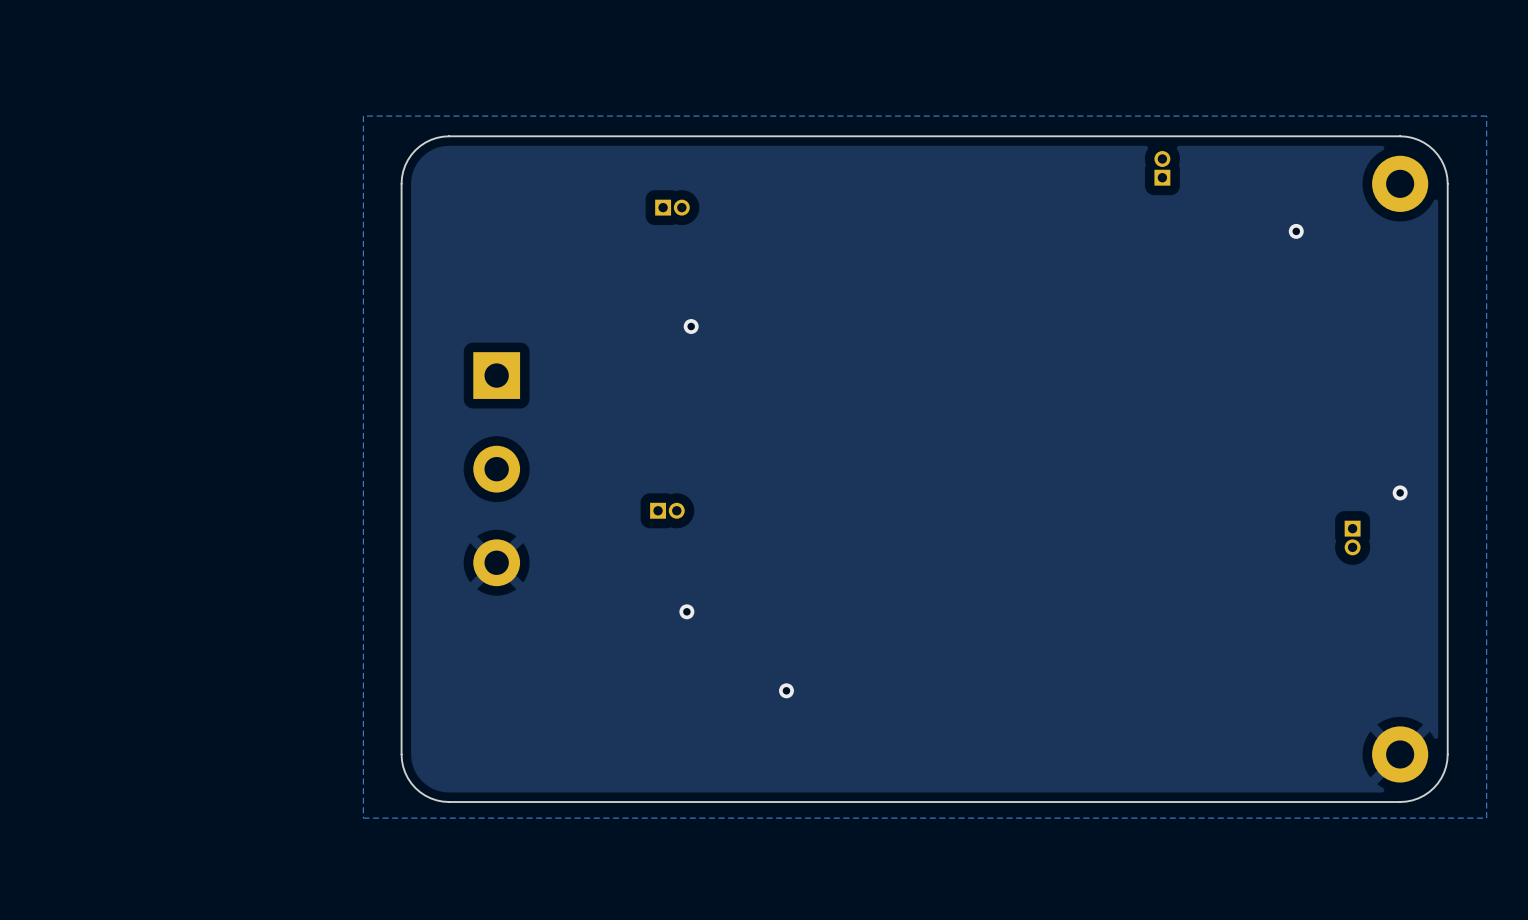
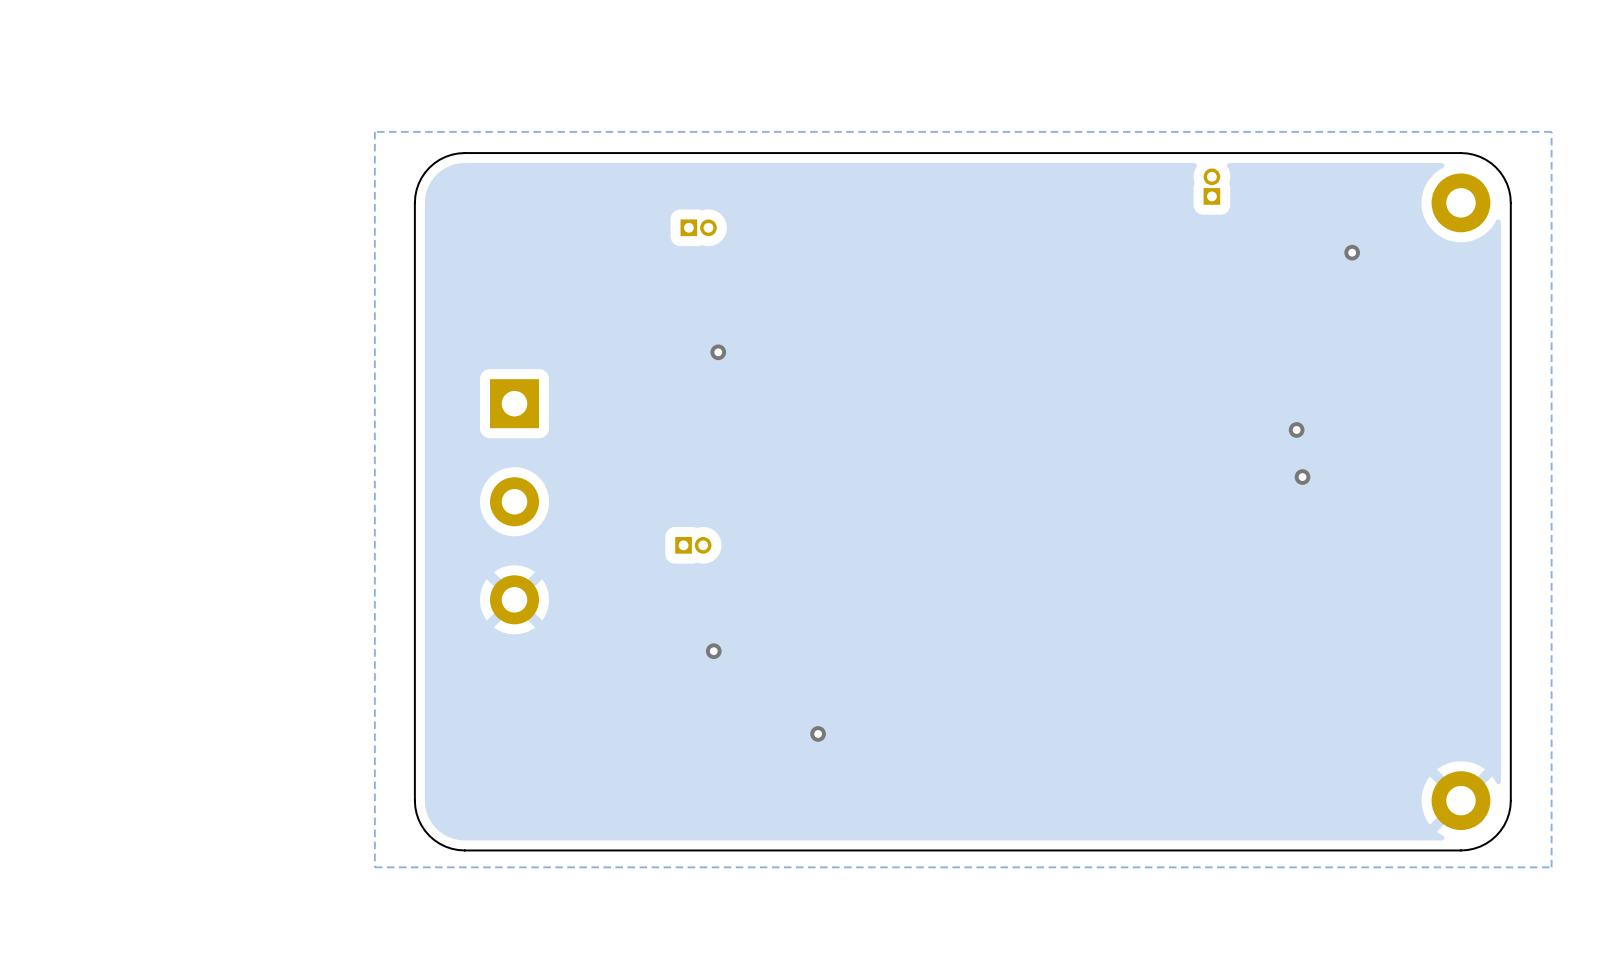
via: none -> (1296, 429)
via: none -> (1302, 477)
via: (1400, 492) -> none
part: (1352, 538) -> none

